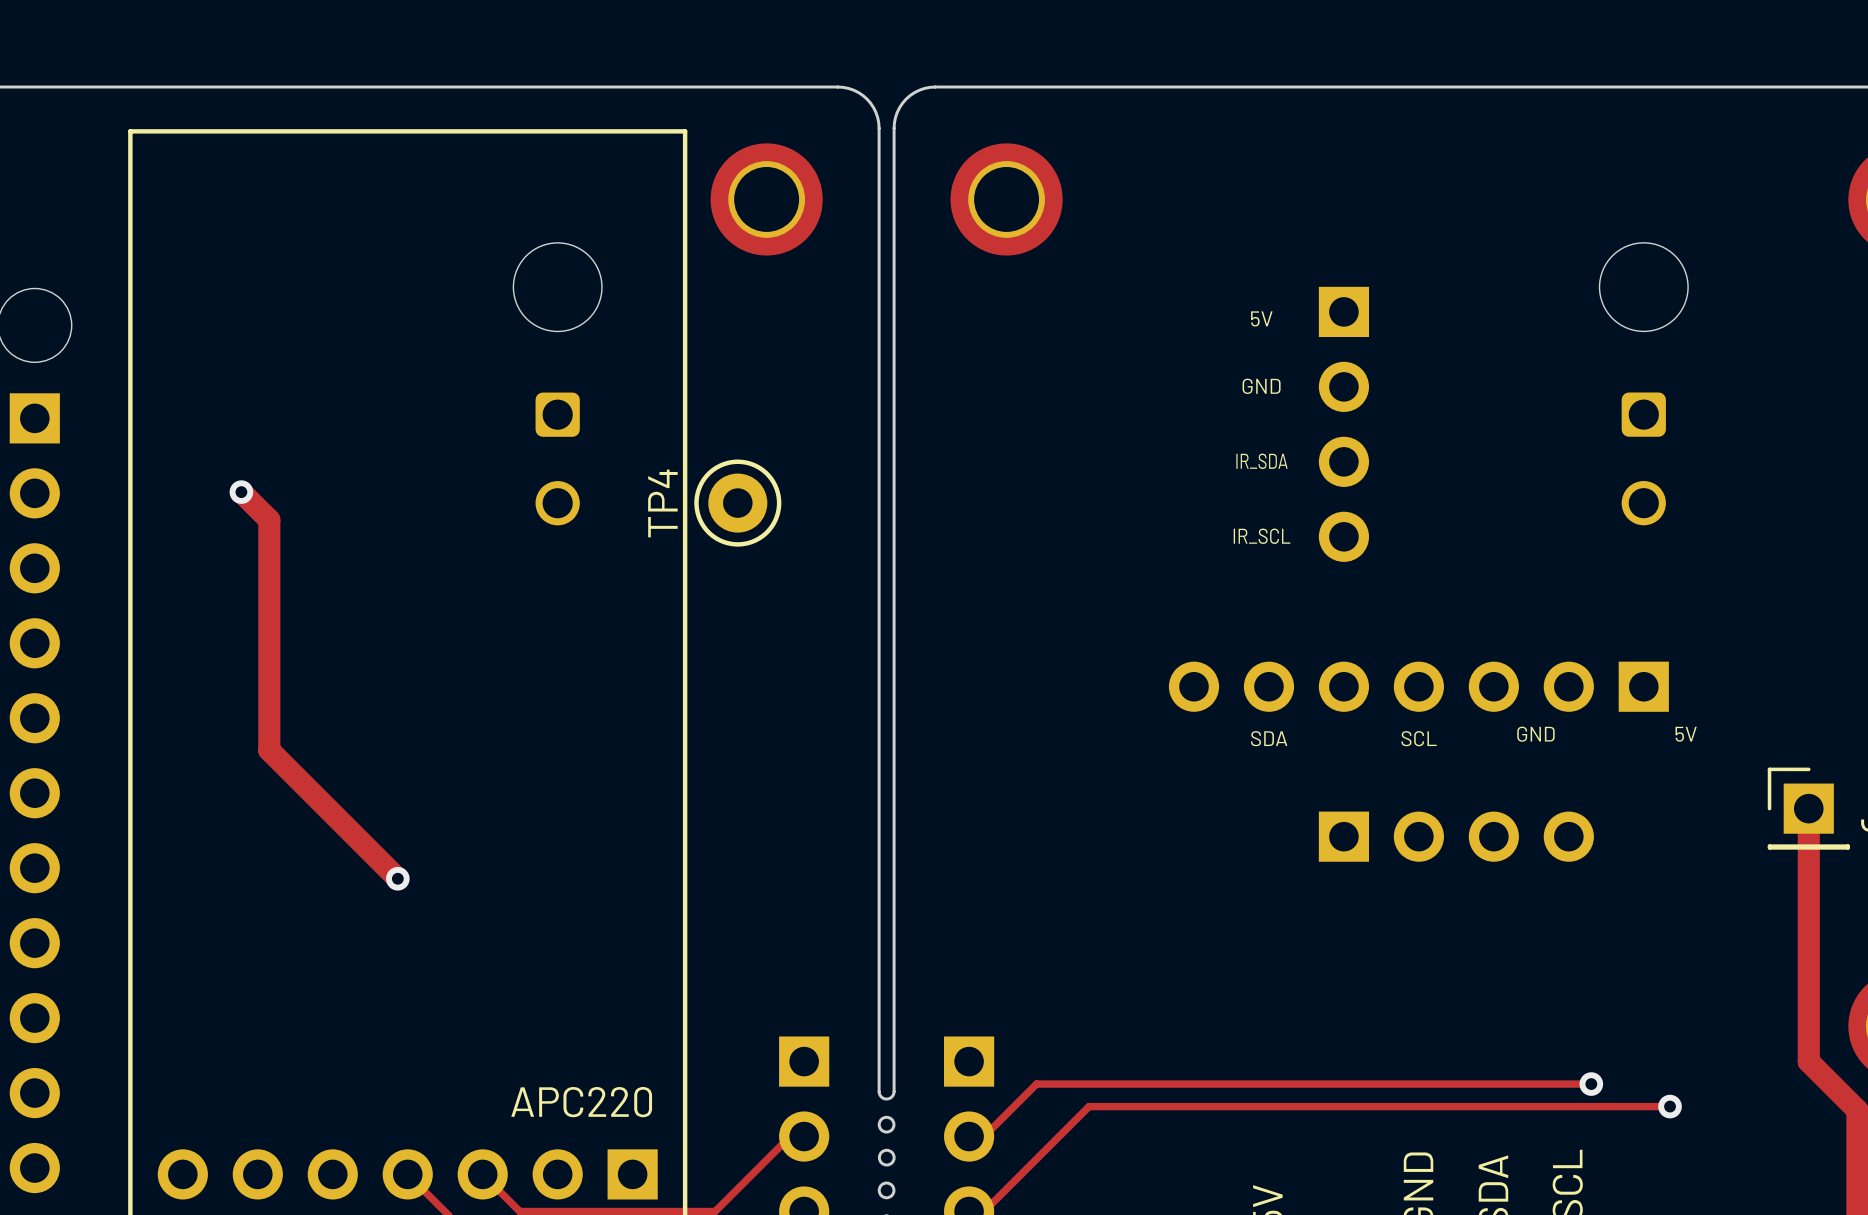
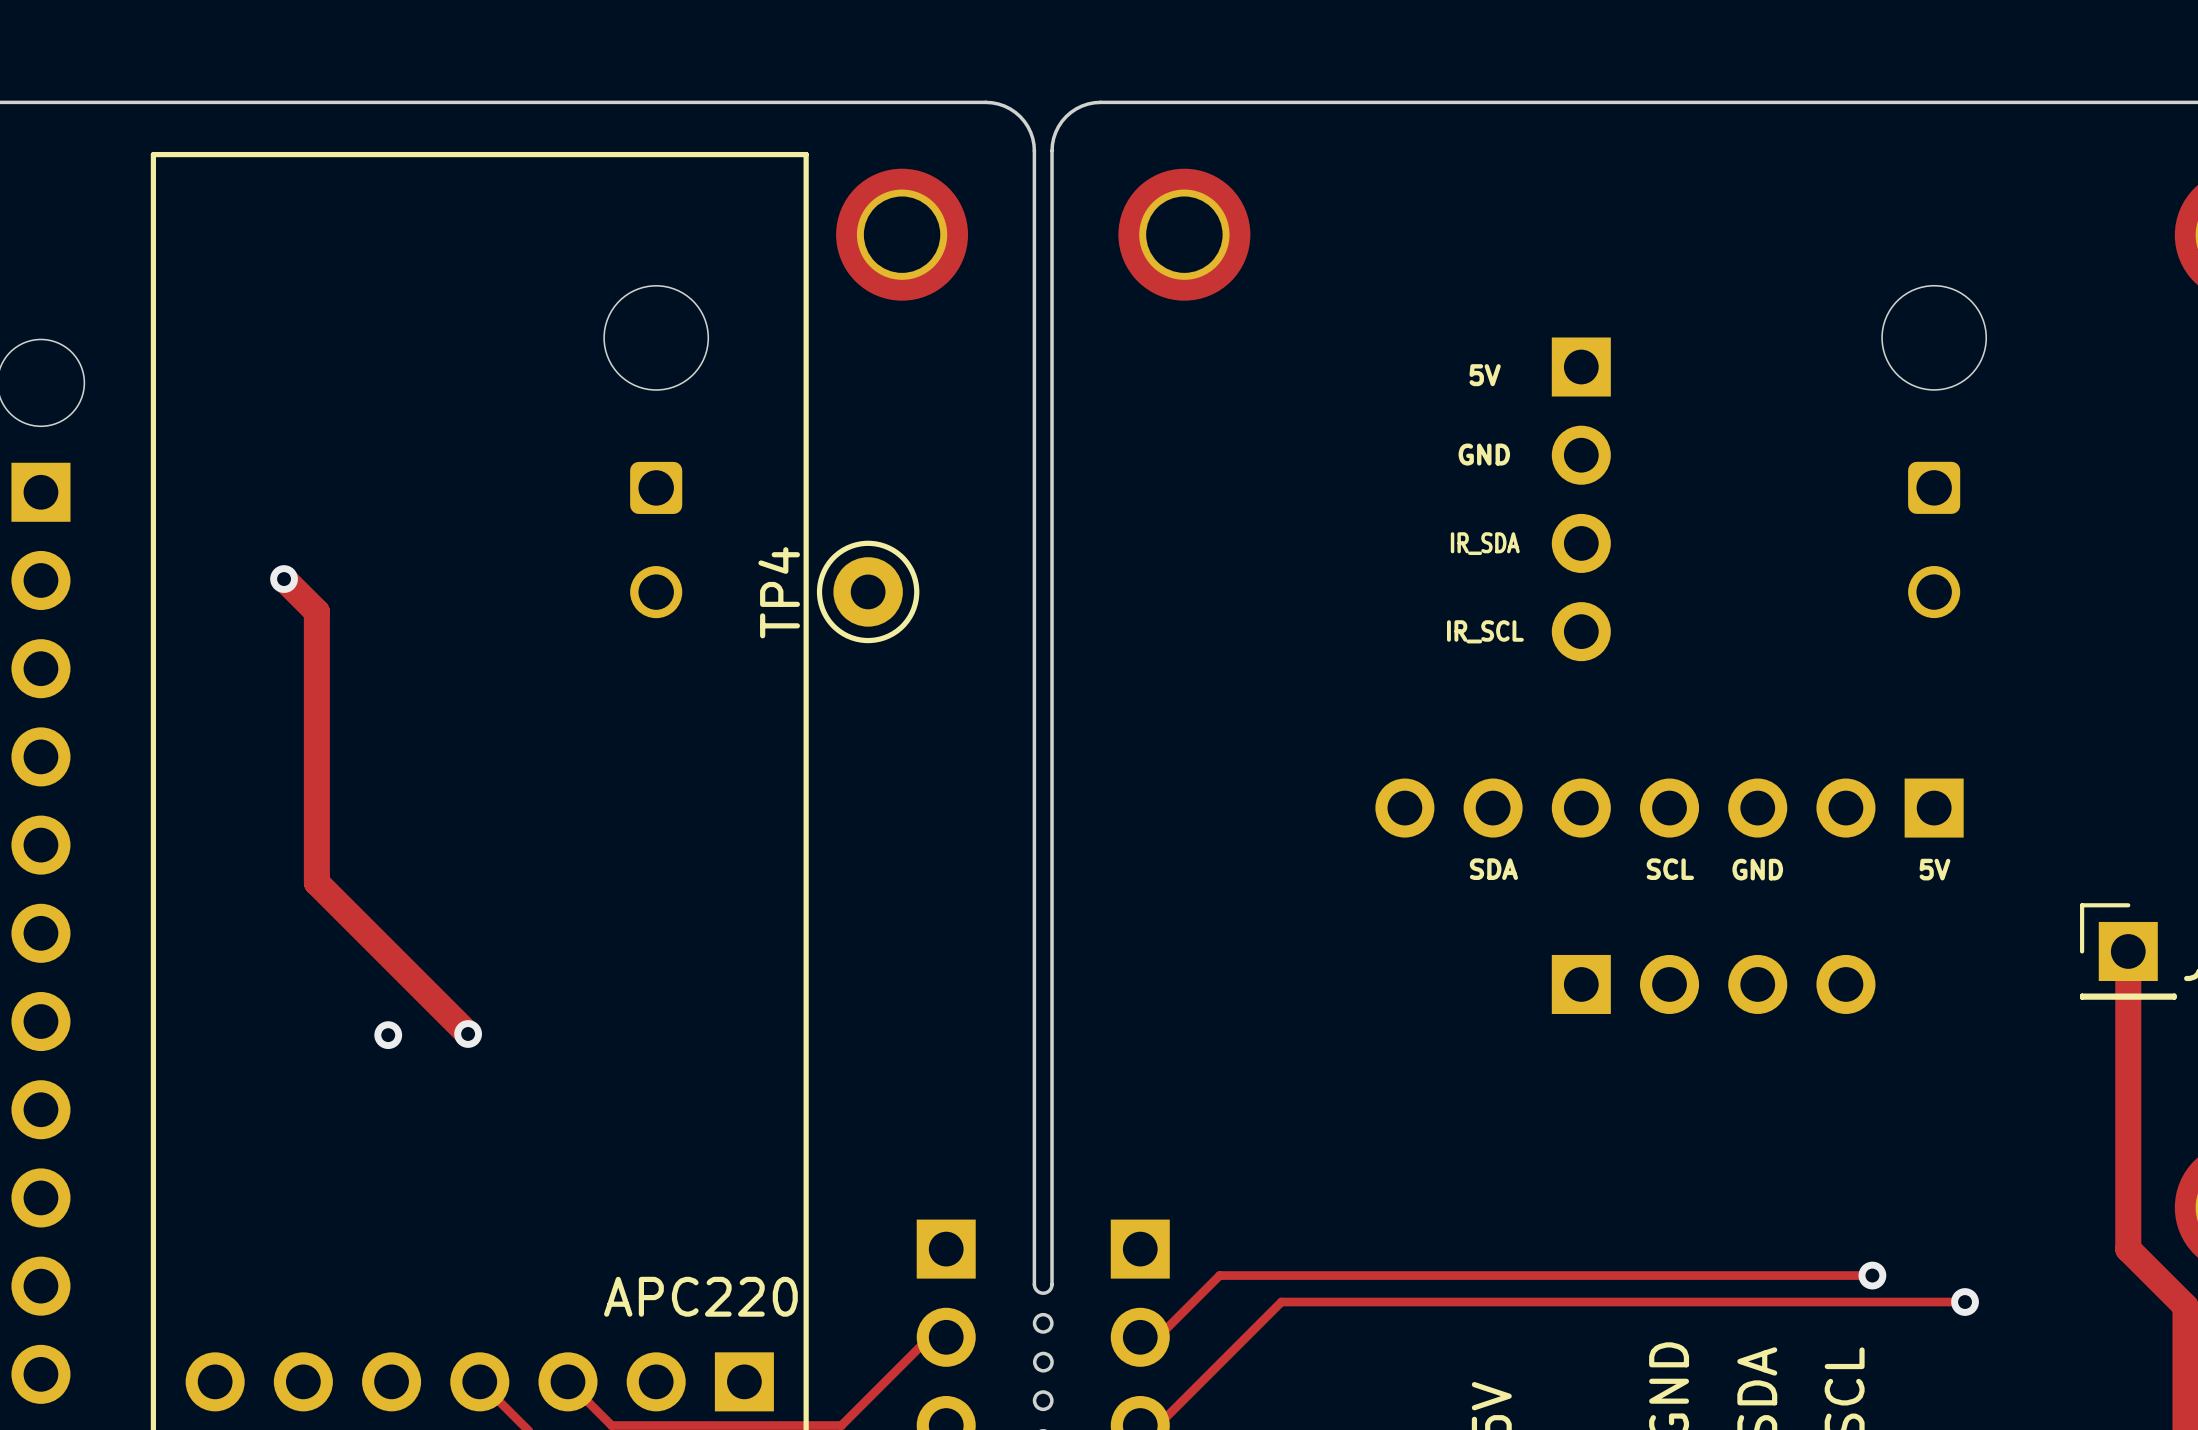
text position: GND (1535, 734) -> GND (1757, 869)
text position: 5V (1686, 734) -> 5V (1934, 869)
via: none -> (388, 1035)

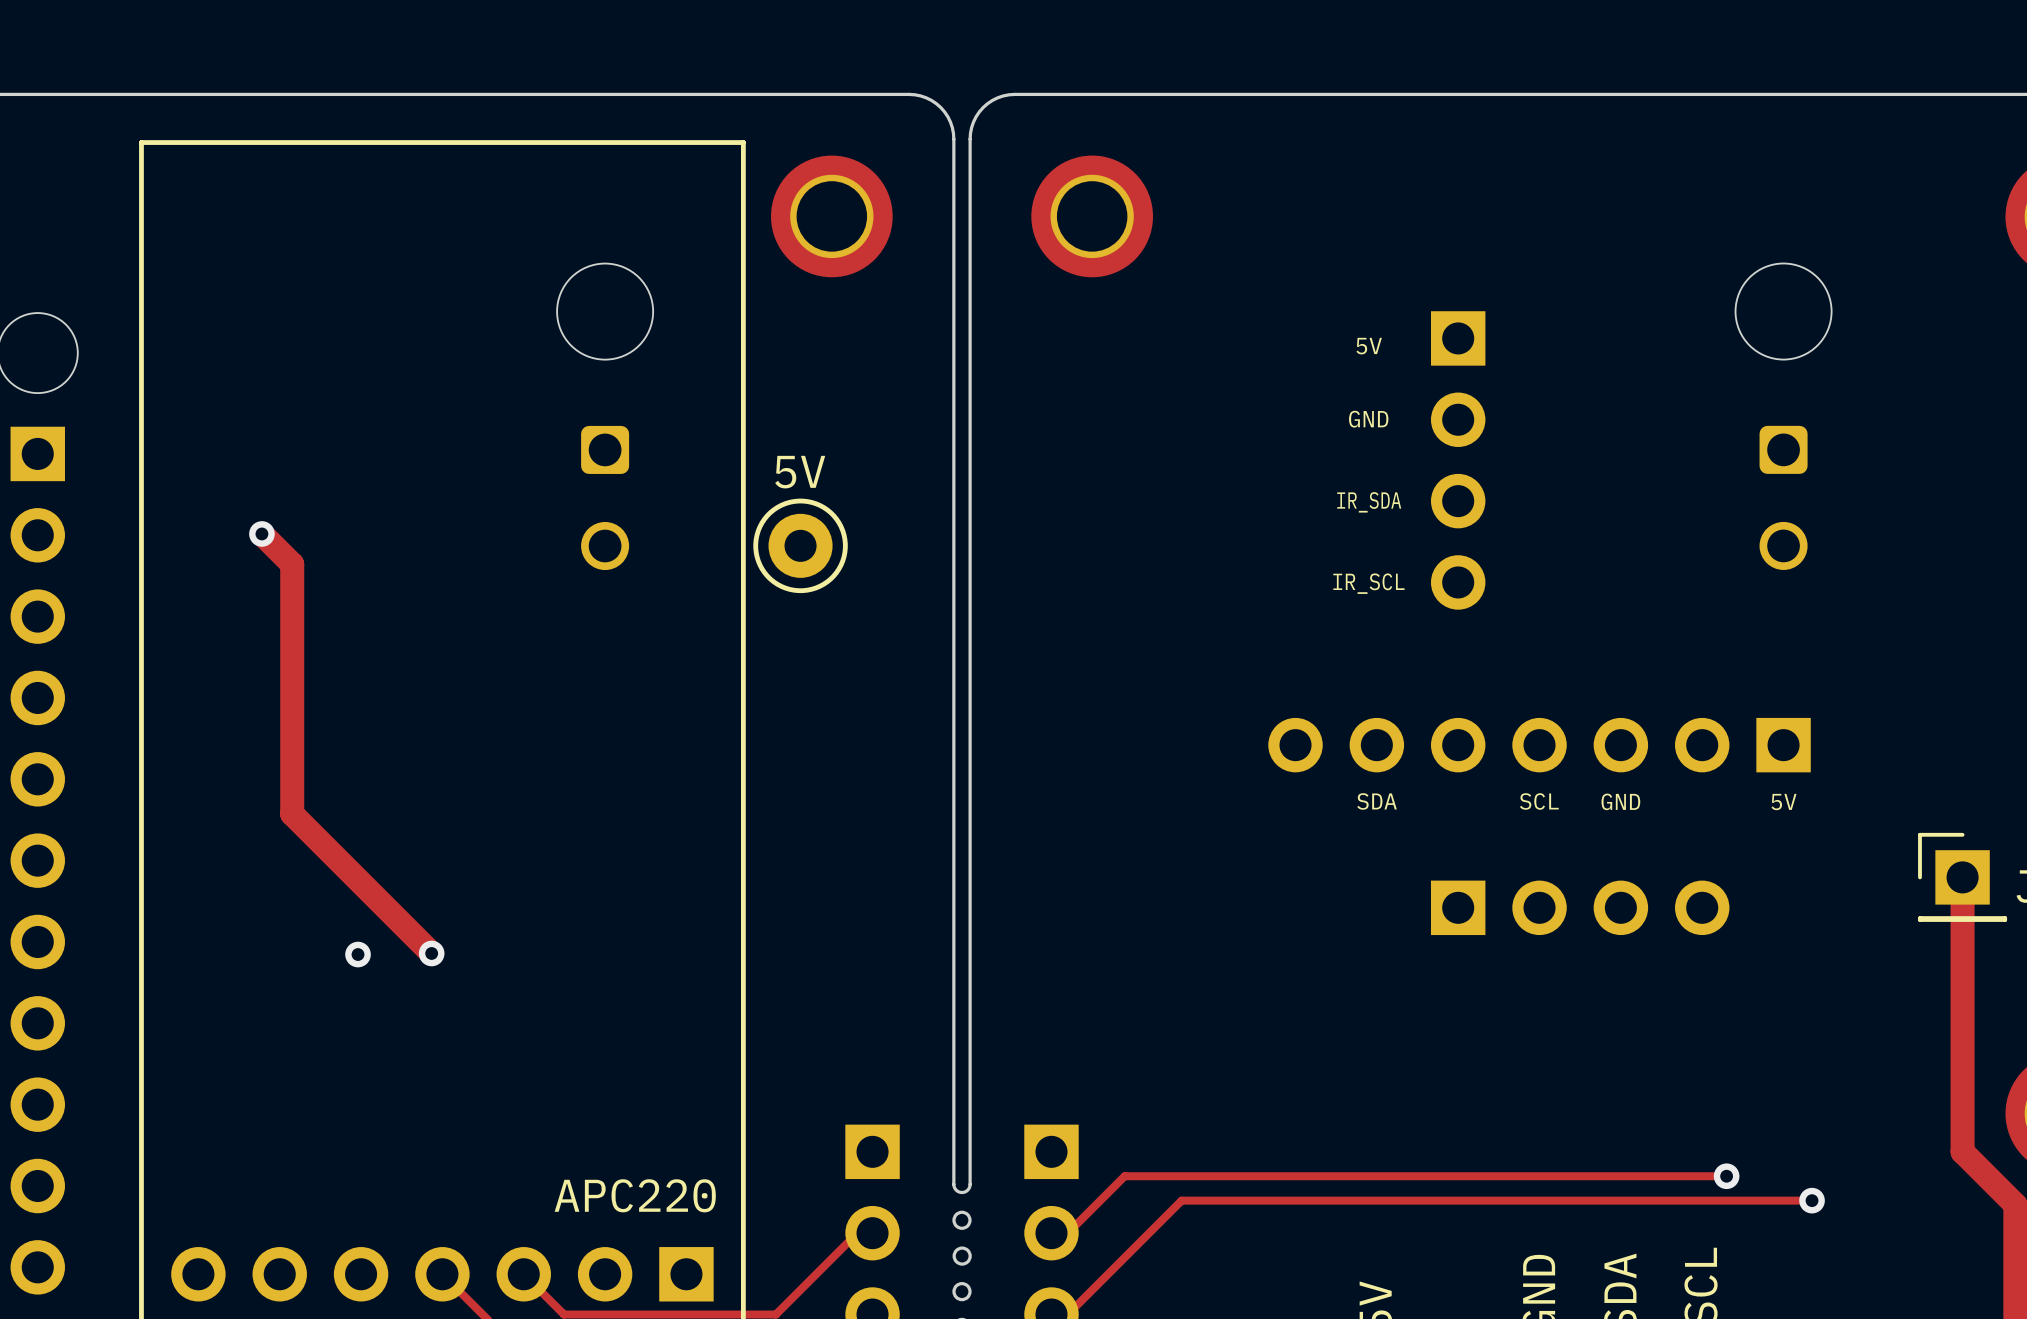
text: none -> 5V (800, 472)
TP4 name: TP4 (779, 592) -> none

